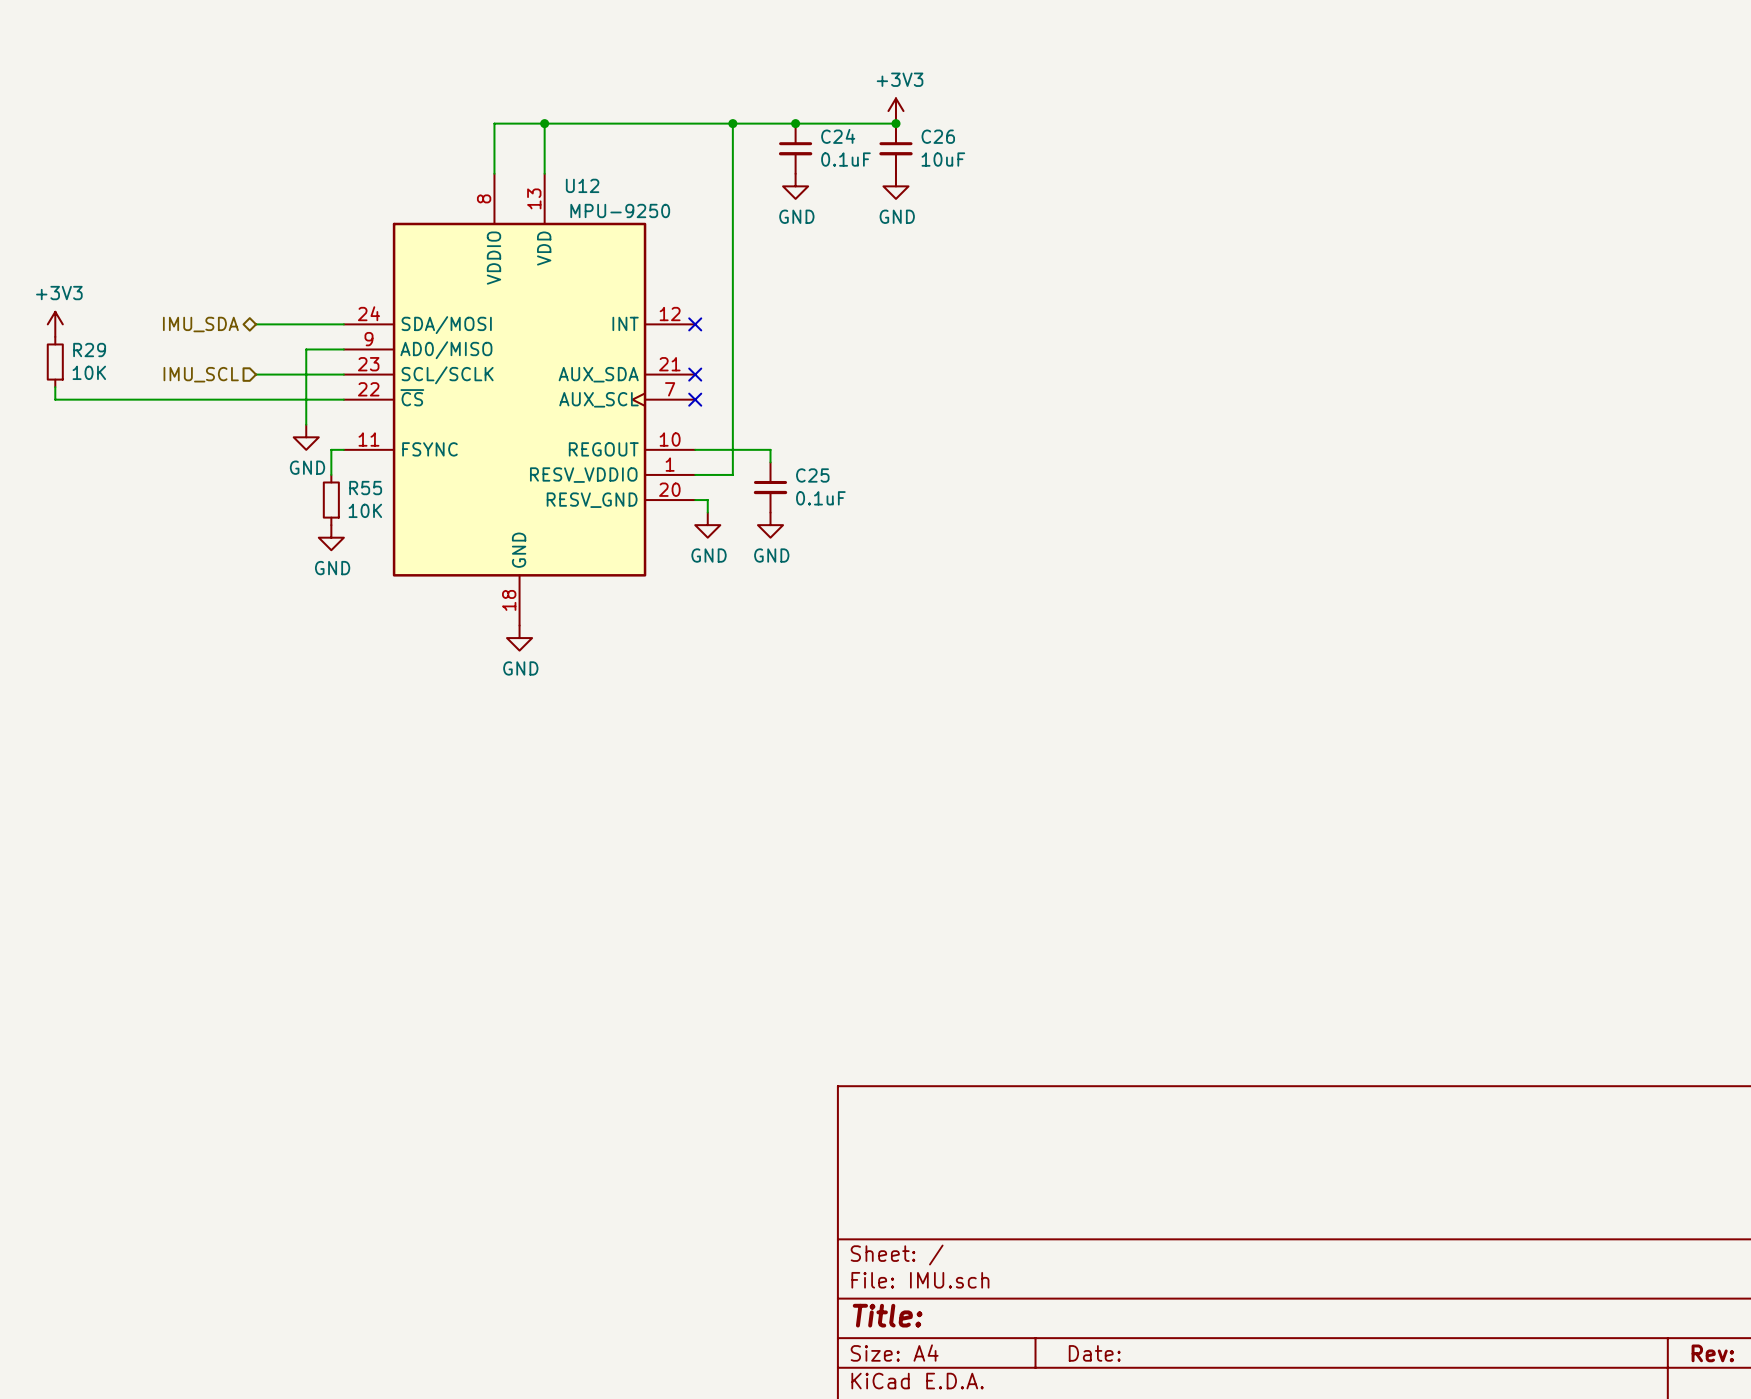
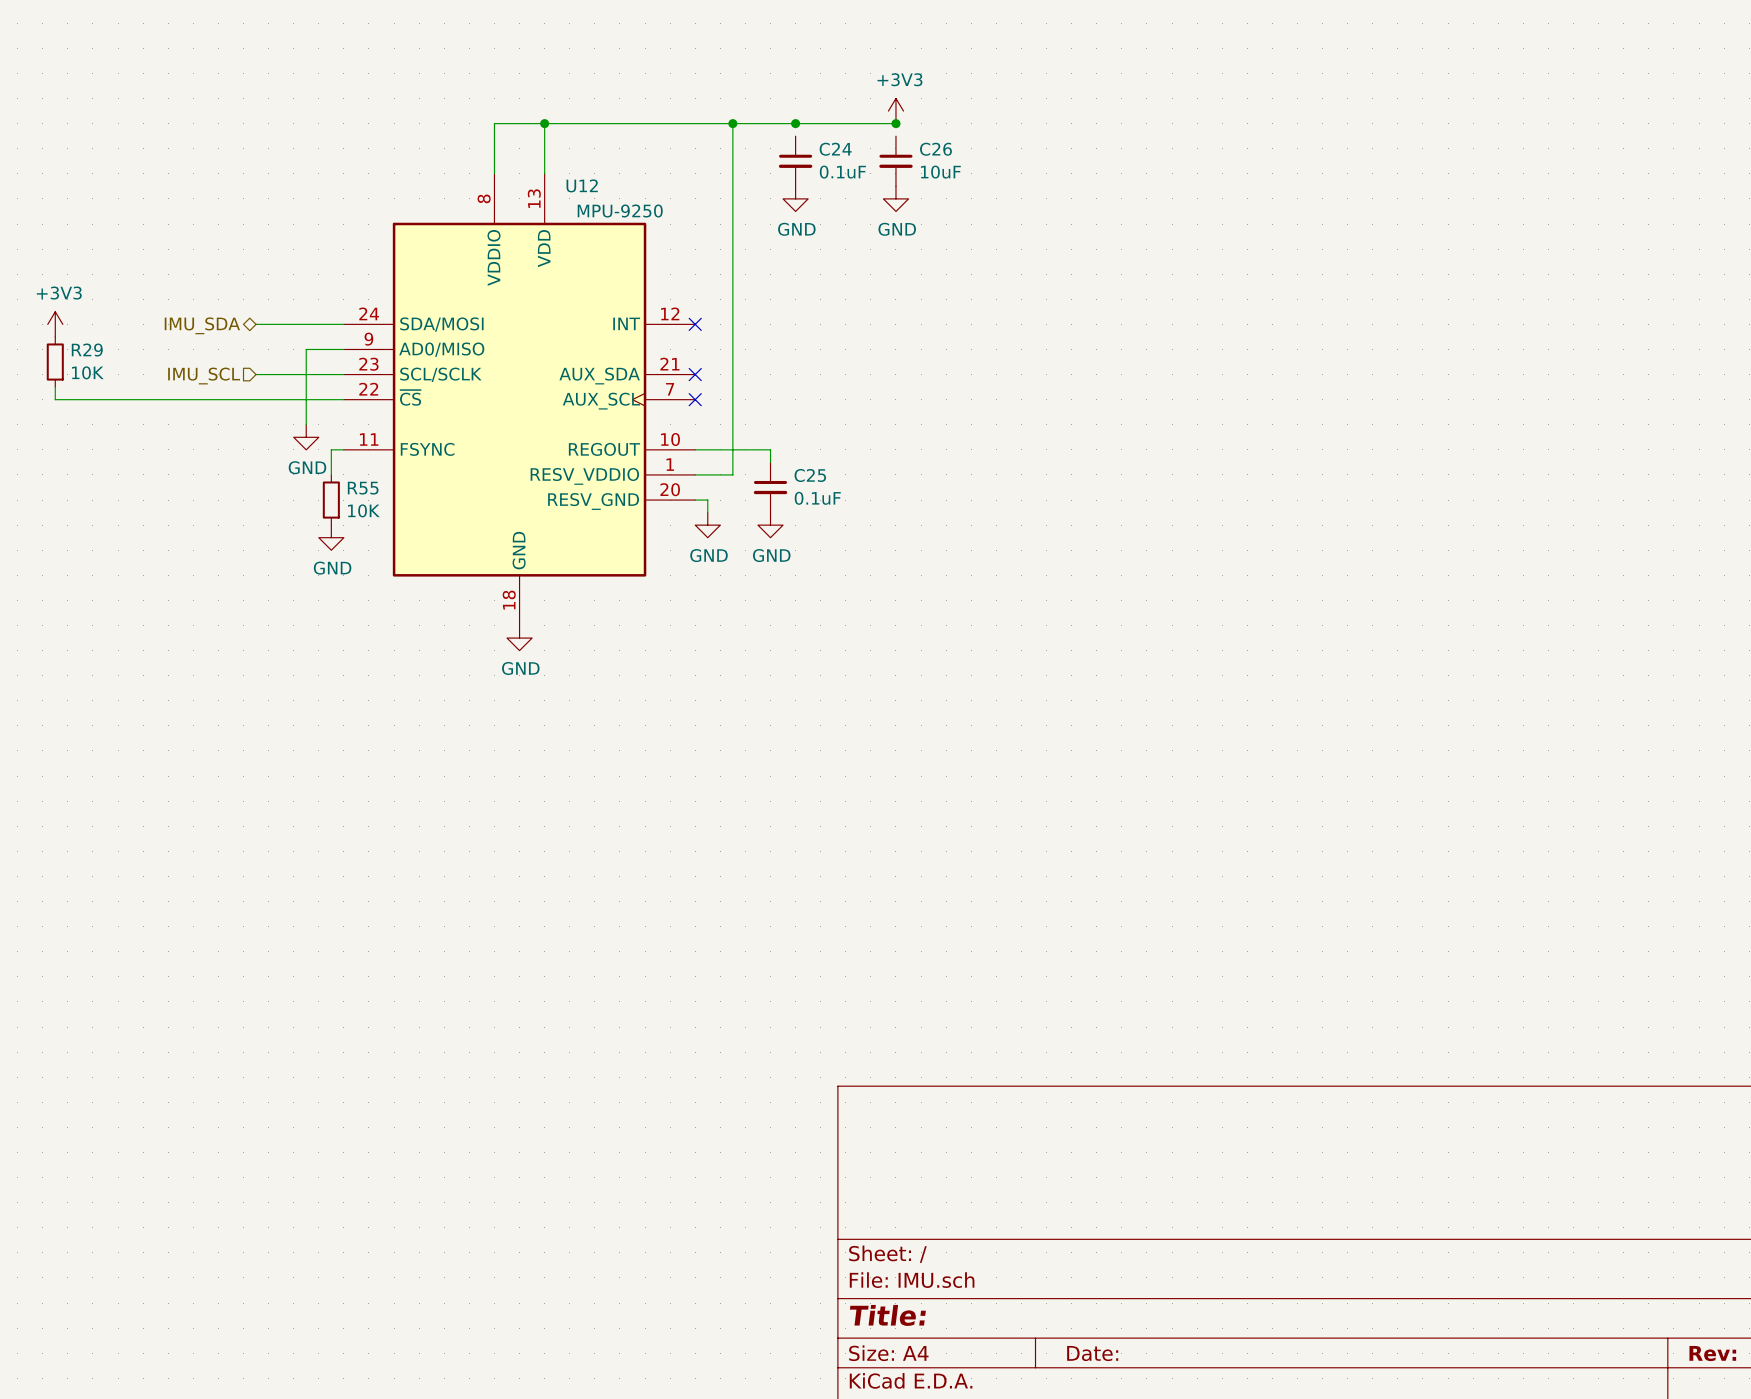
C24 position: (795, 148) -> (795, 161)
C26 position: (895, 148) -> (895, 161)
power symbol position: GND (795, 186) -> GND (795, 198)
power symbol position: GND (895, 186) -> GND (895, 198)

